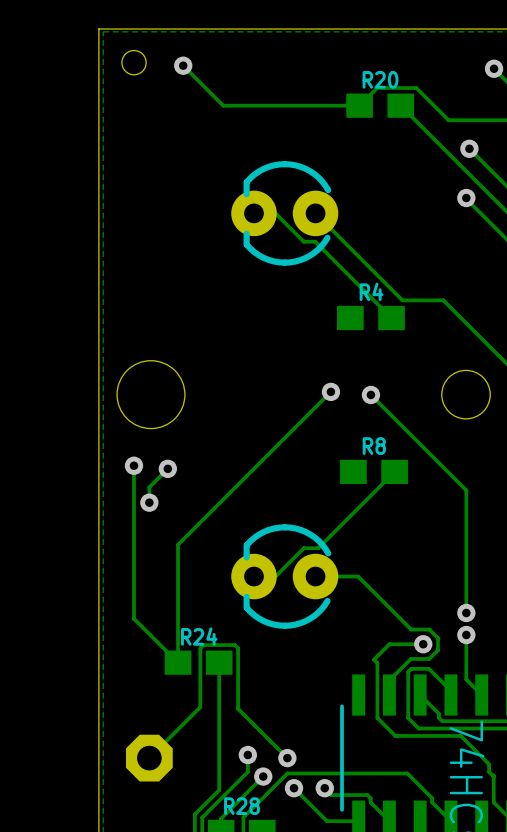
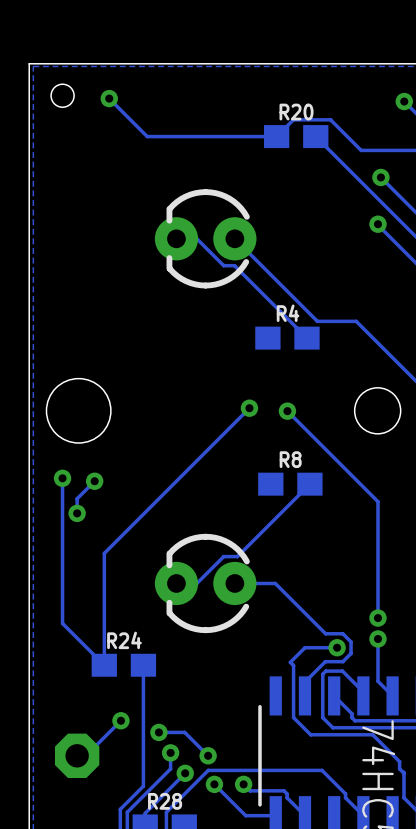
via: none -> (120, 720)
via: none -> (158, 732)
track: (262, 733) (238, 708) (238, 648) (234, 645) (203, 645) (200, 648) (200, 707) (149, 758) -> (120, 720) (85, 755) (77, 755)
track: none -> (184, 732) (158, 732)

